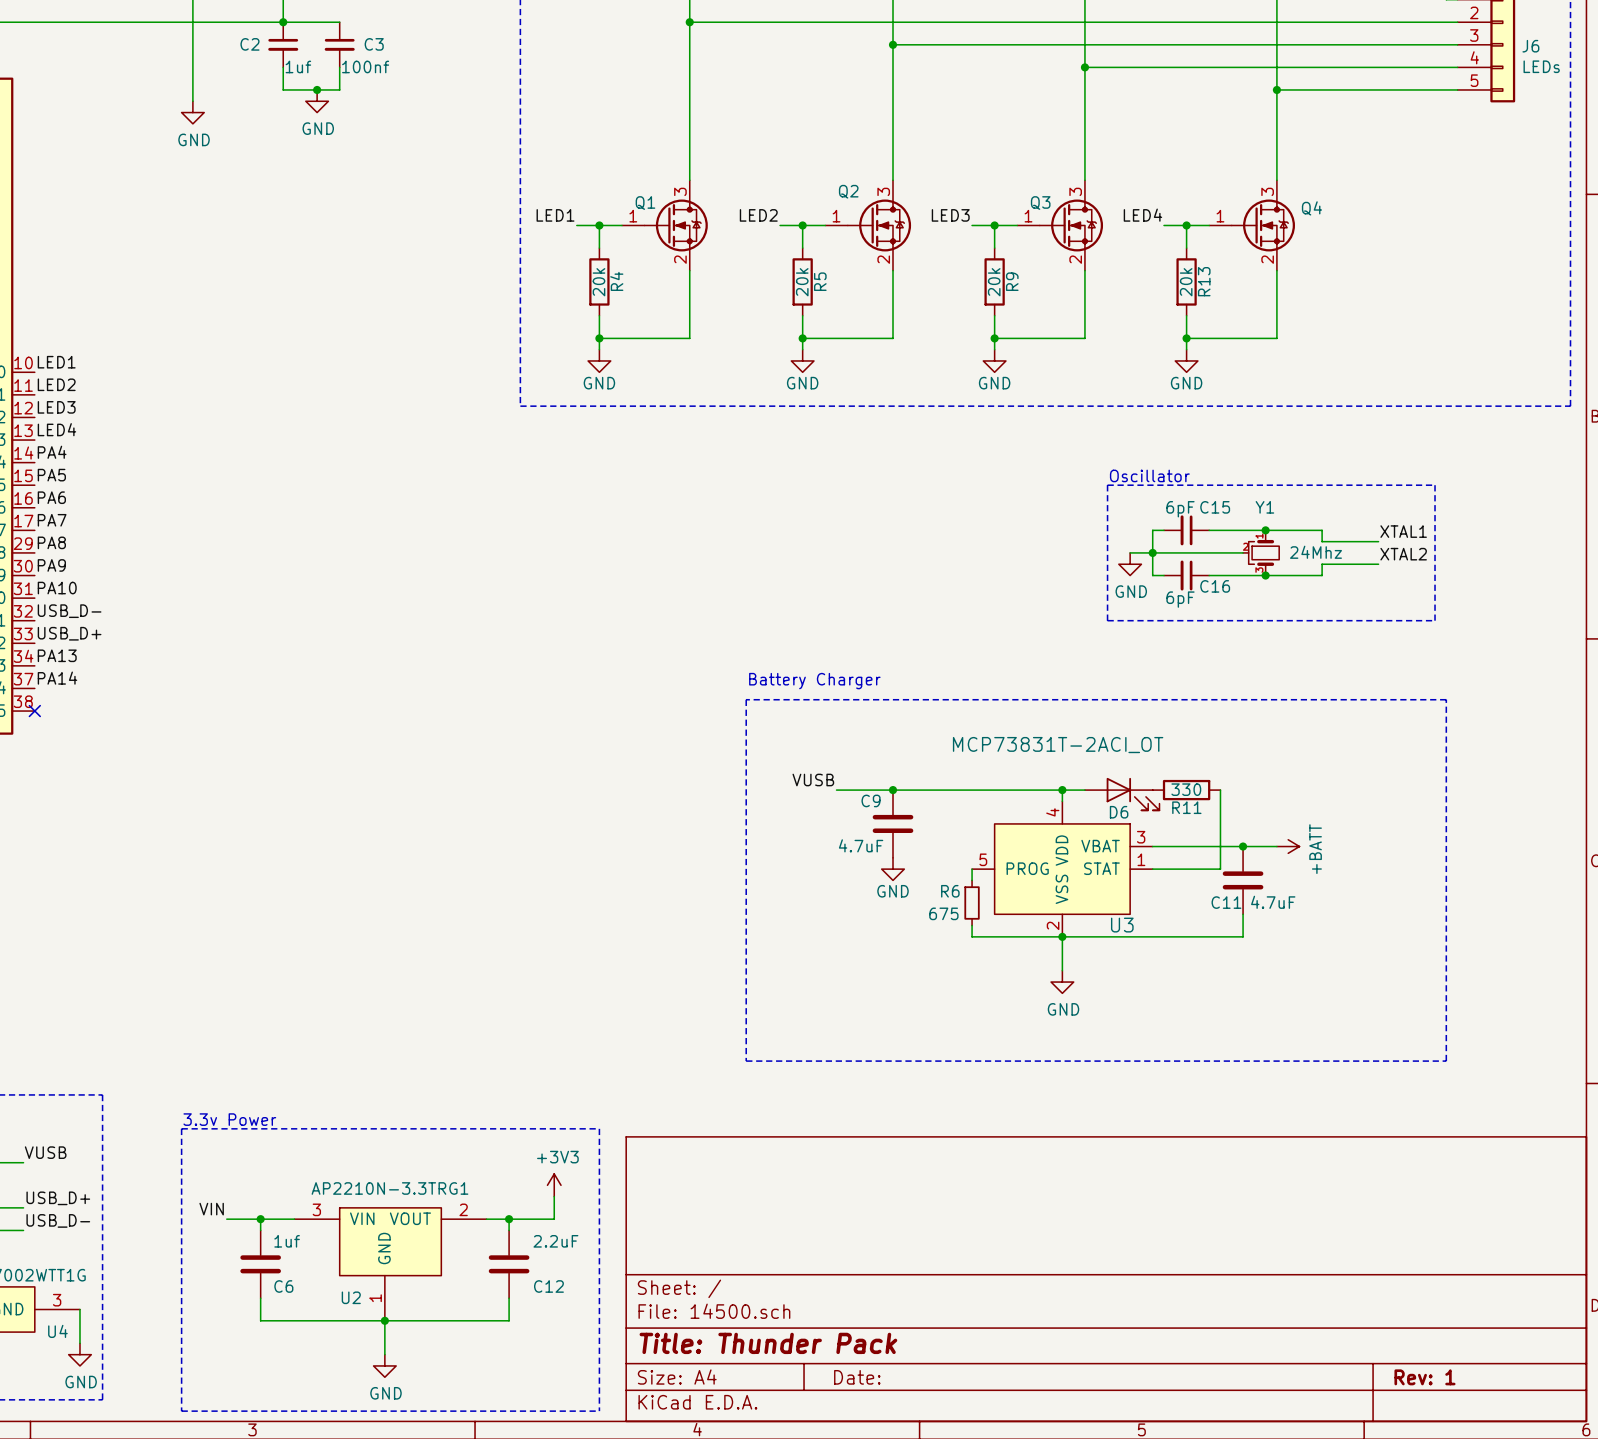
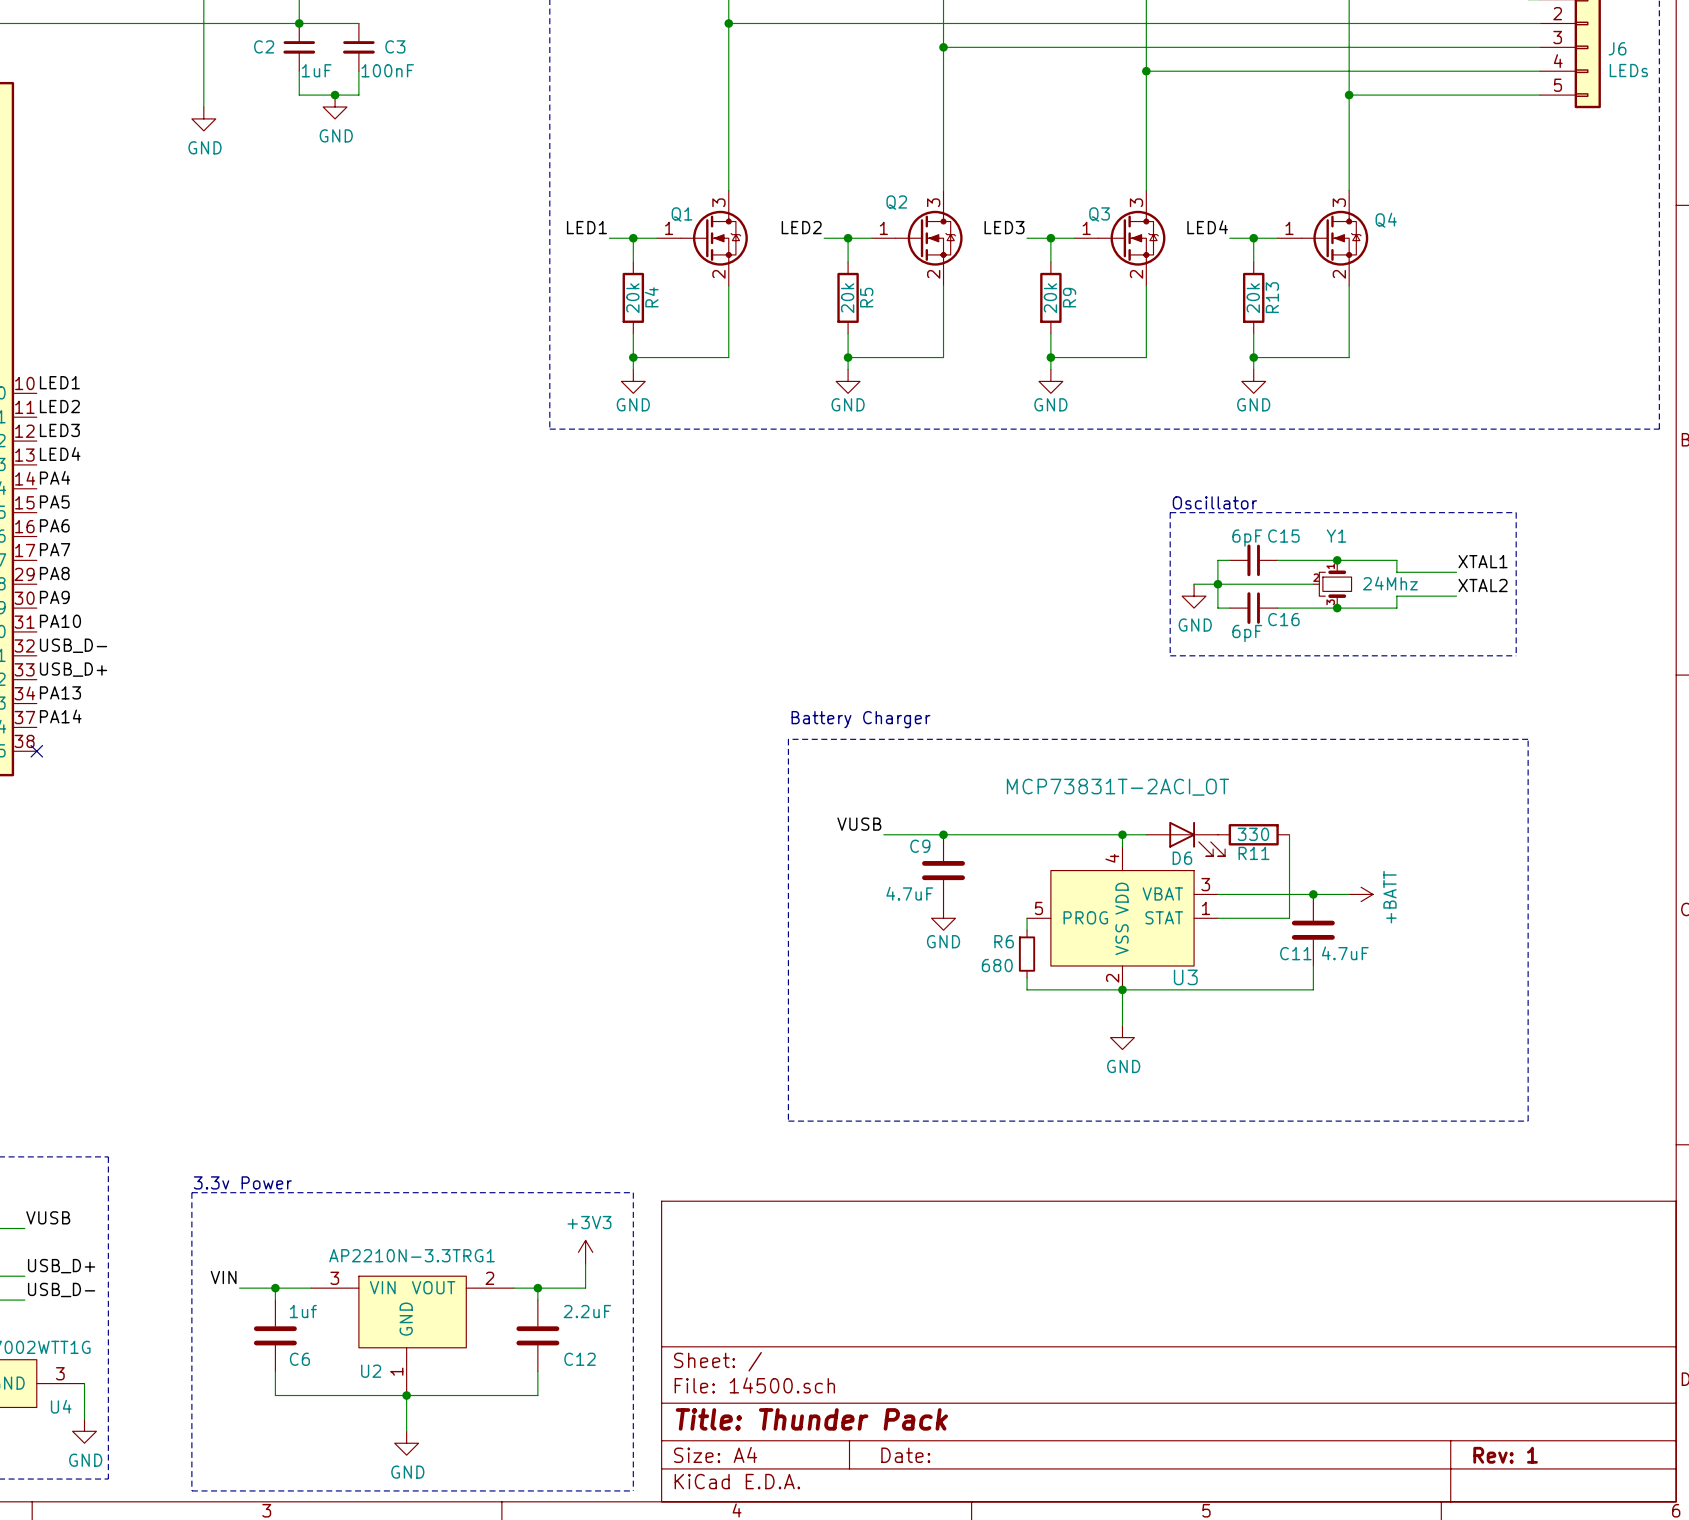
C2 value: 1uf (298, 66) -> 1uF (316, 70)
C3 value: 100nf (365, 66) -> 100nF (387, 70)
R6 value: 675 (943, 913) -> 680 (997, 965)

